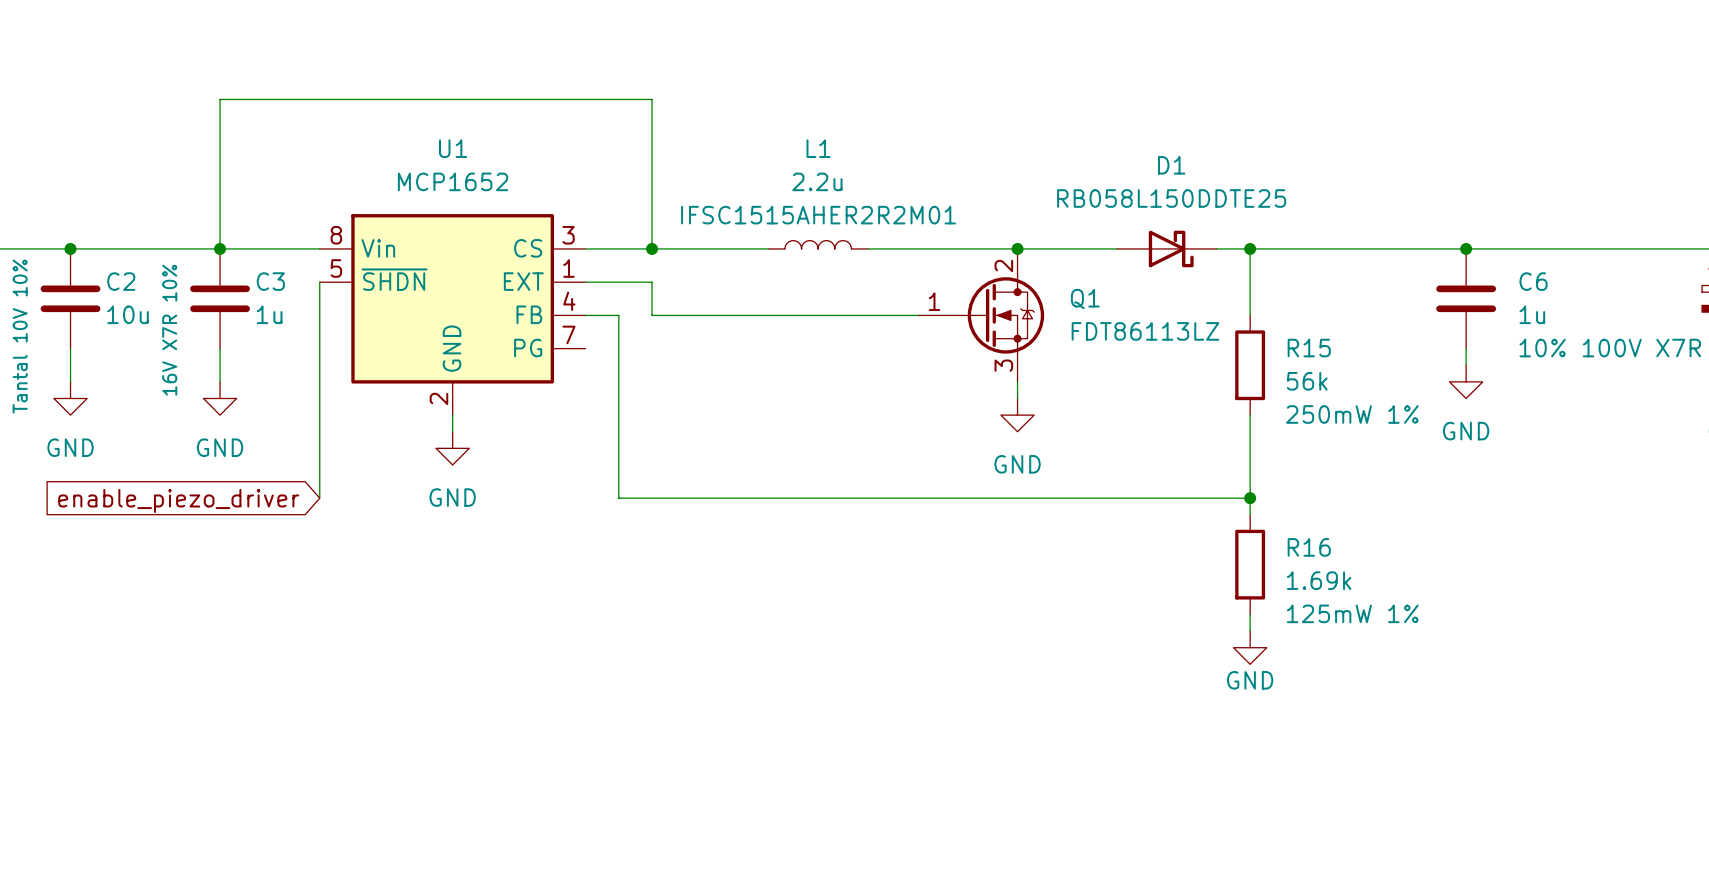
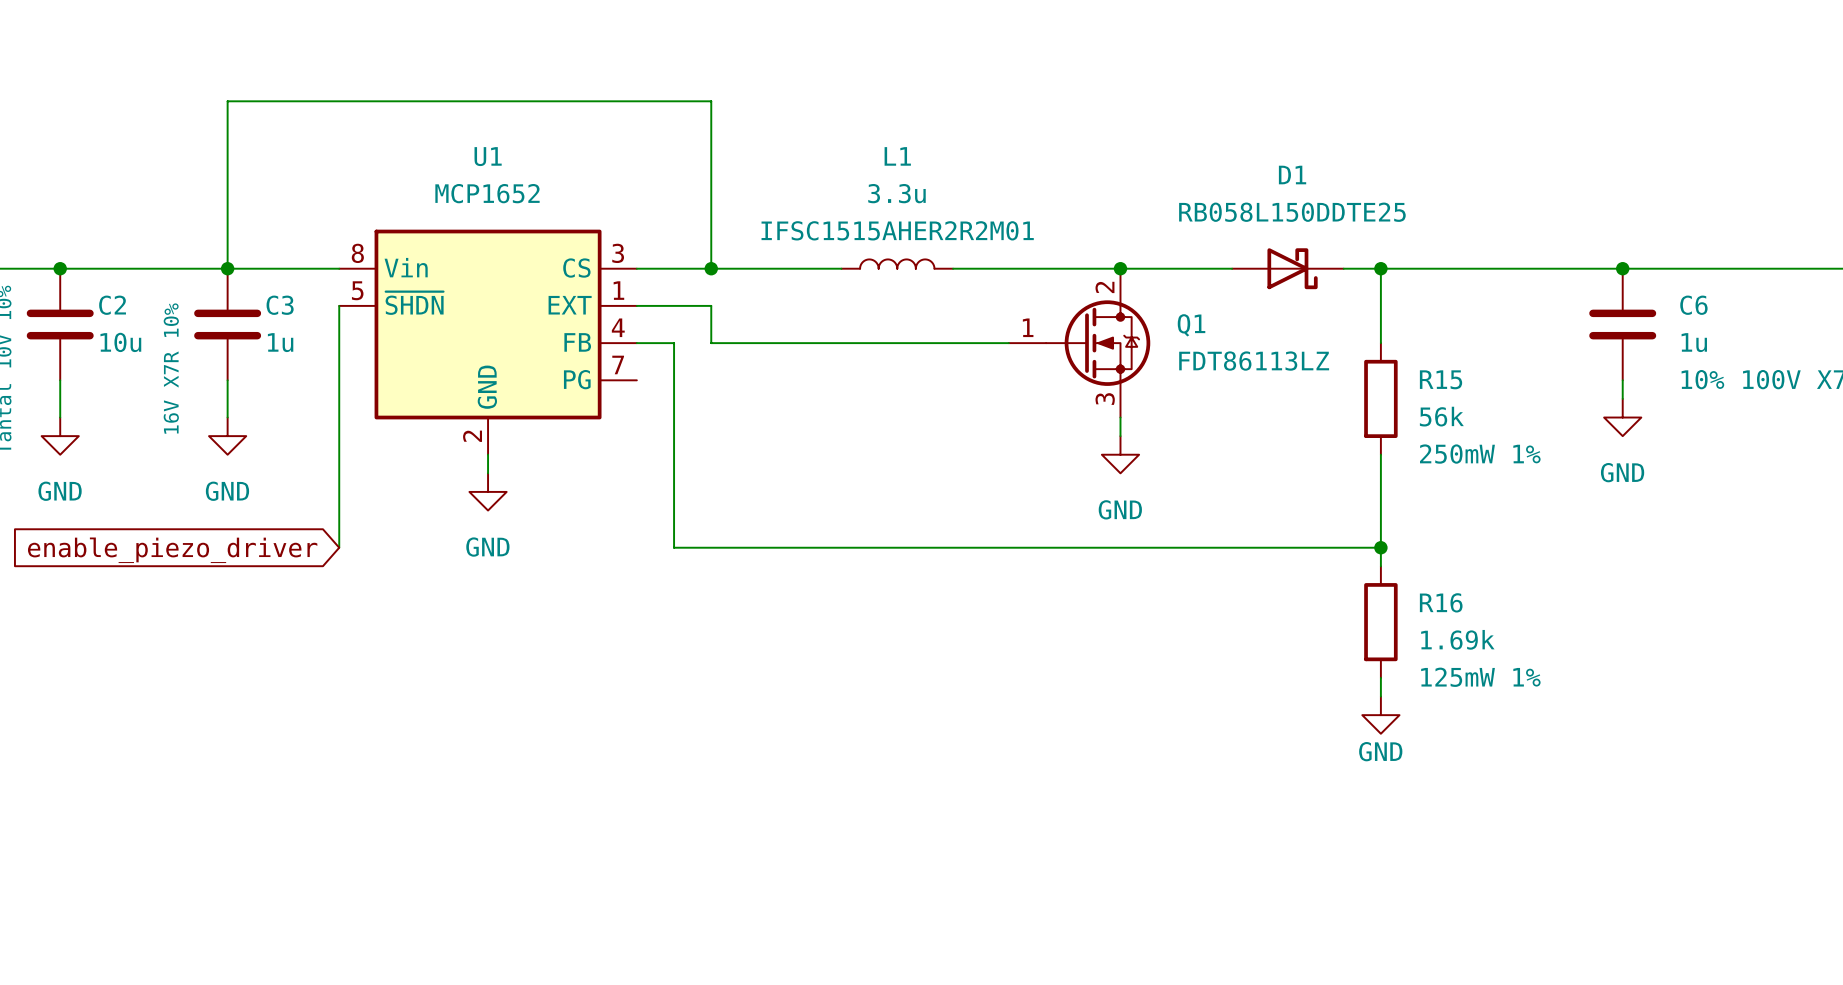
L1 value: 2.2u (817, 181) -> 3.3u (896, 193)

